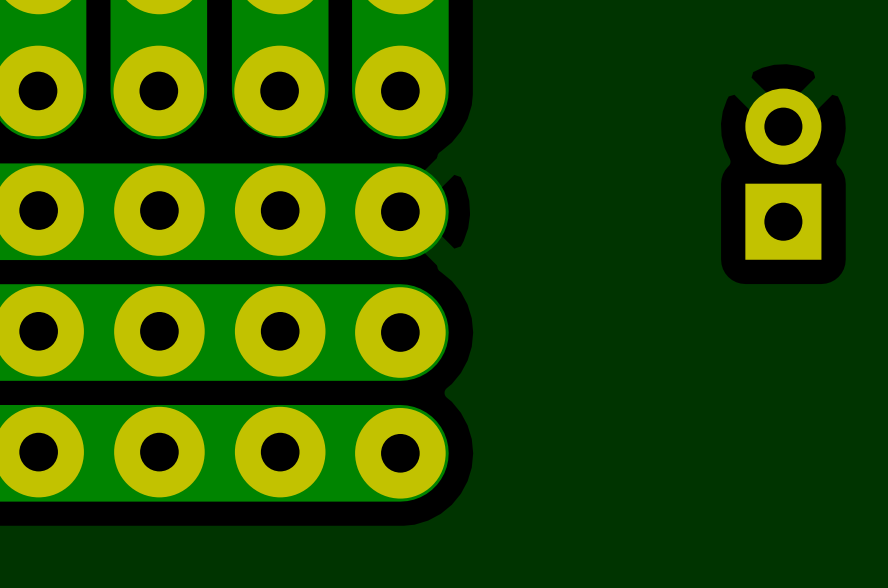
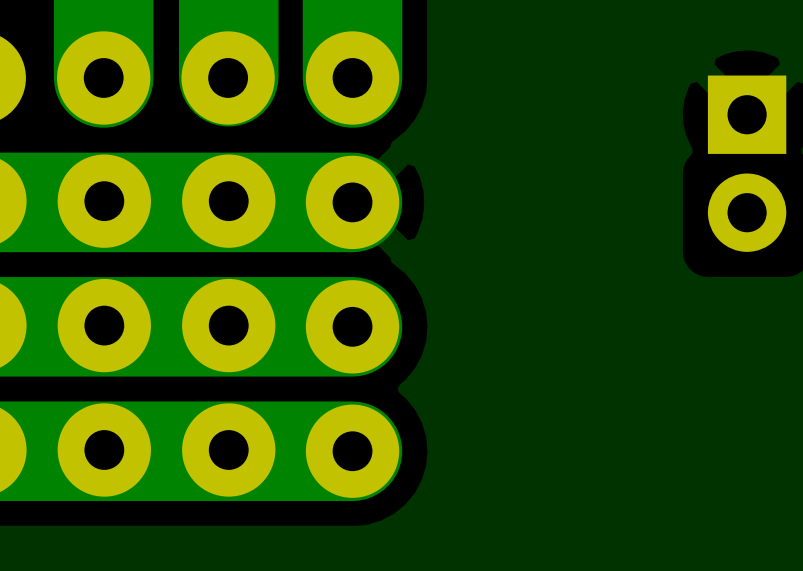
part rotation: 0° (783, 174) -> 180° (747, 163)

